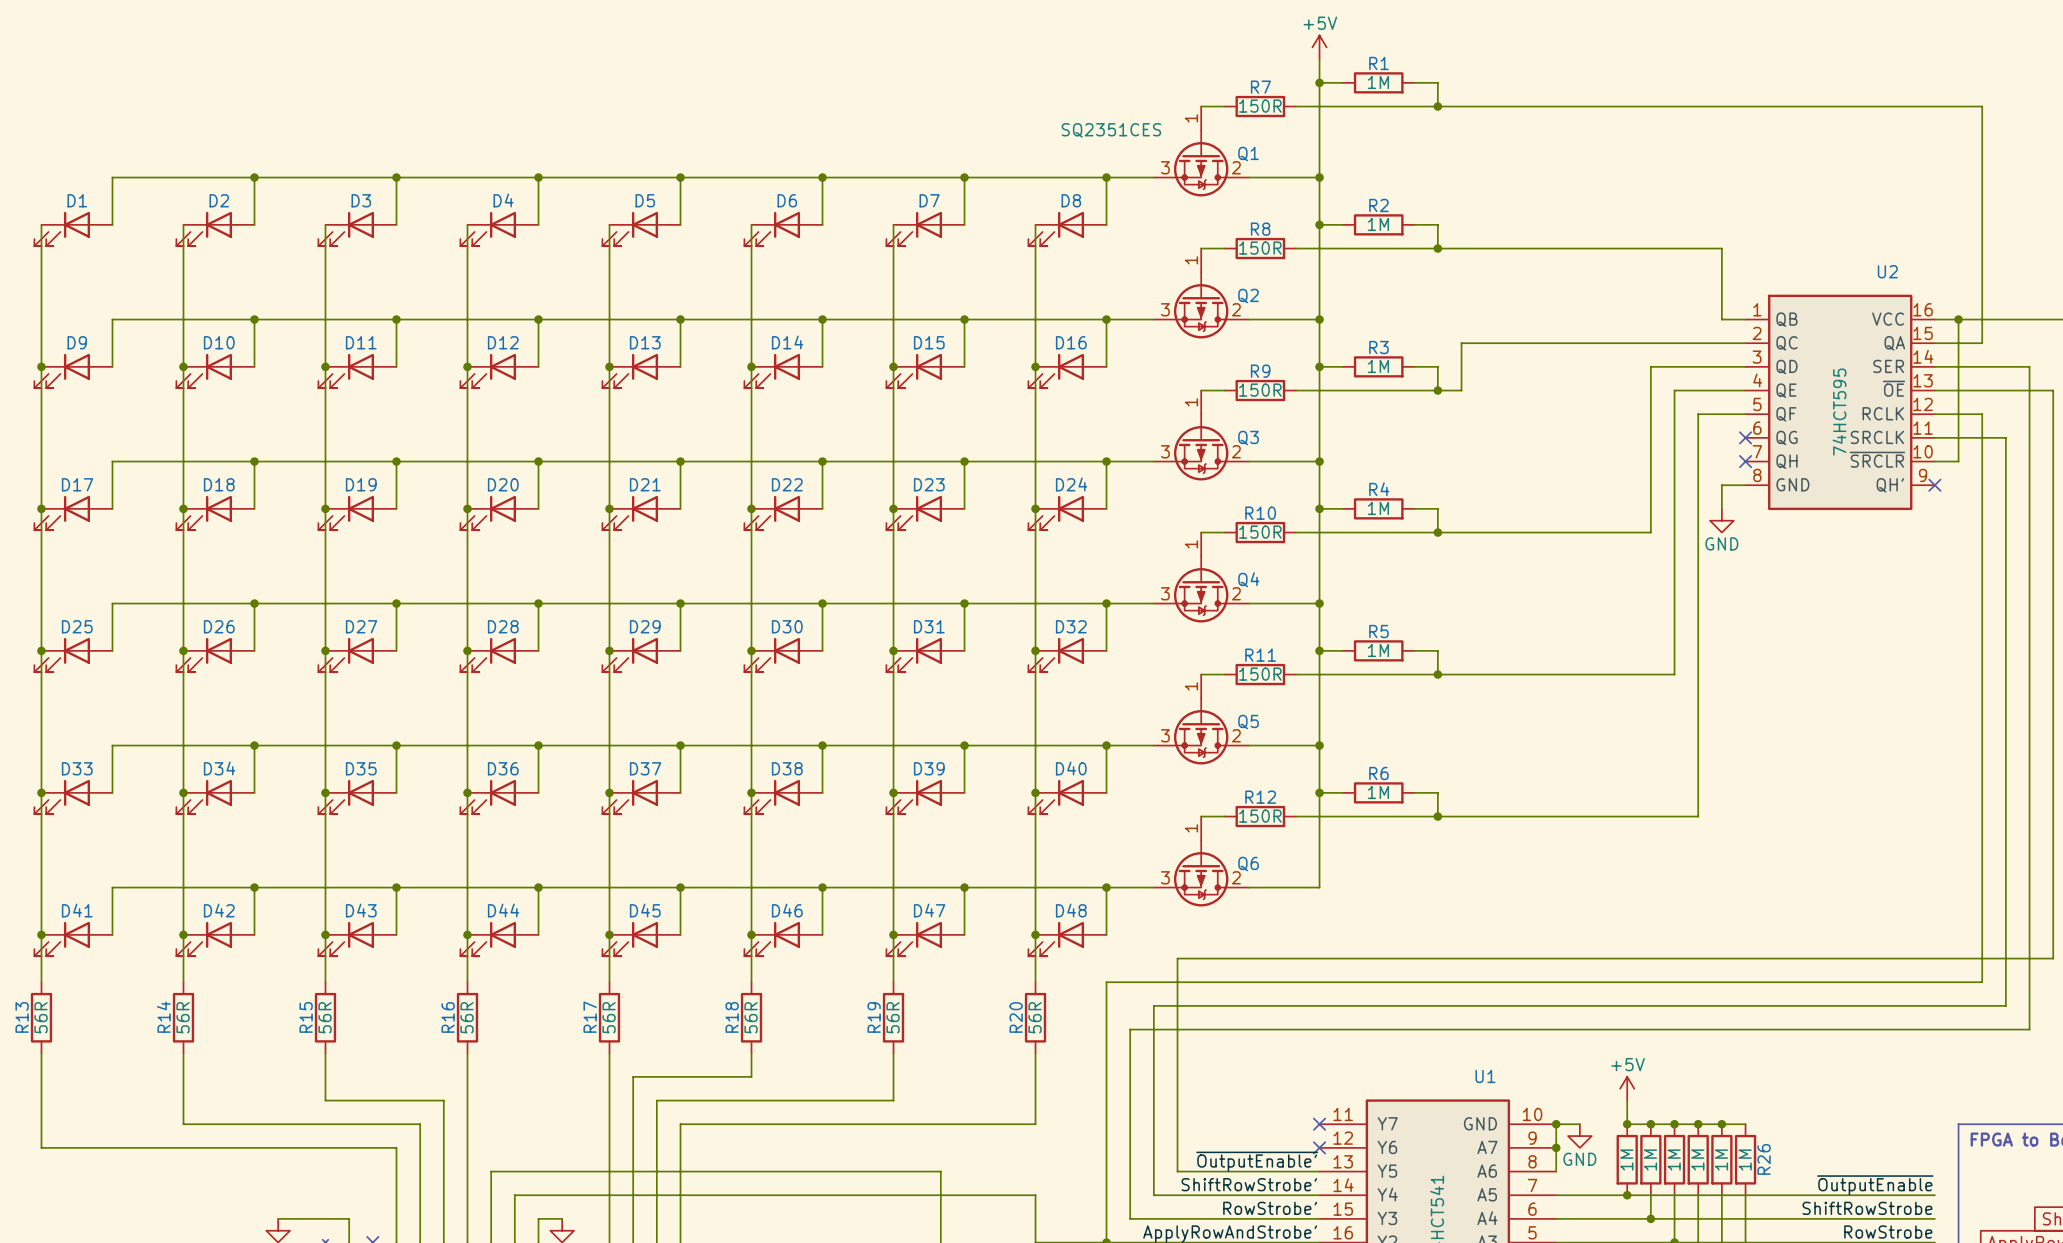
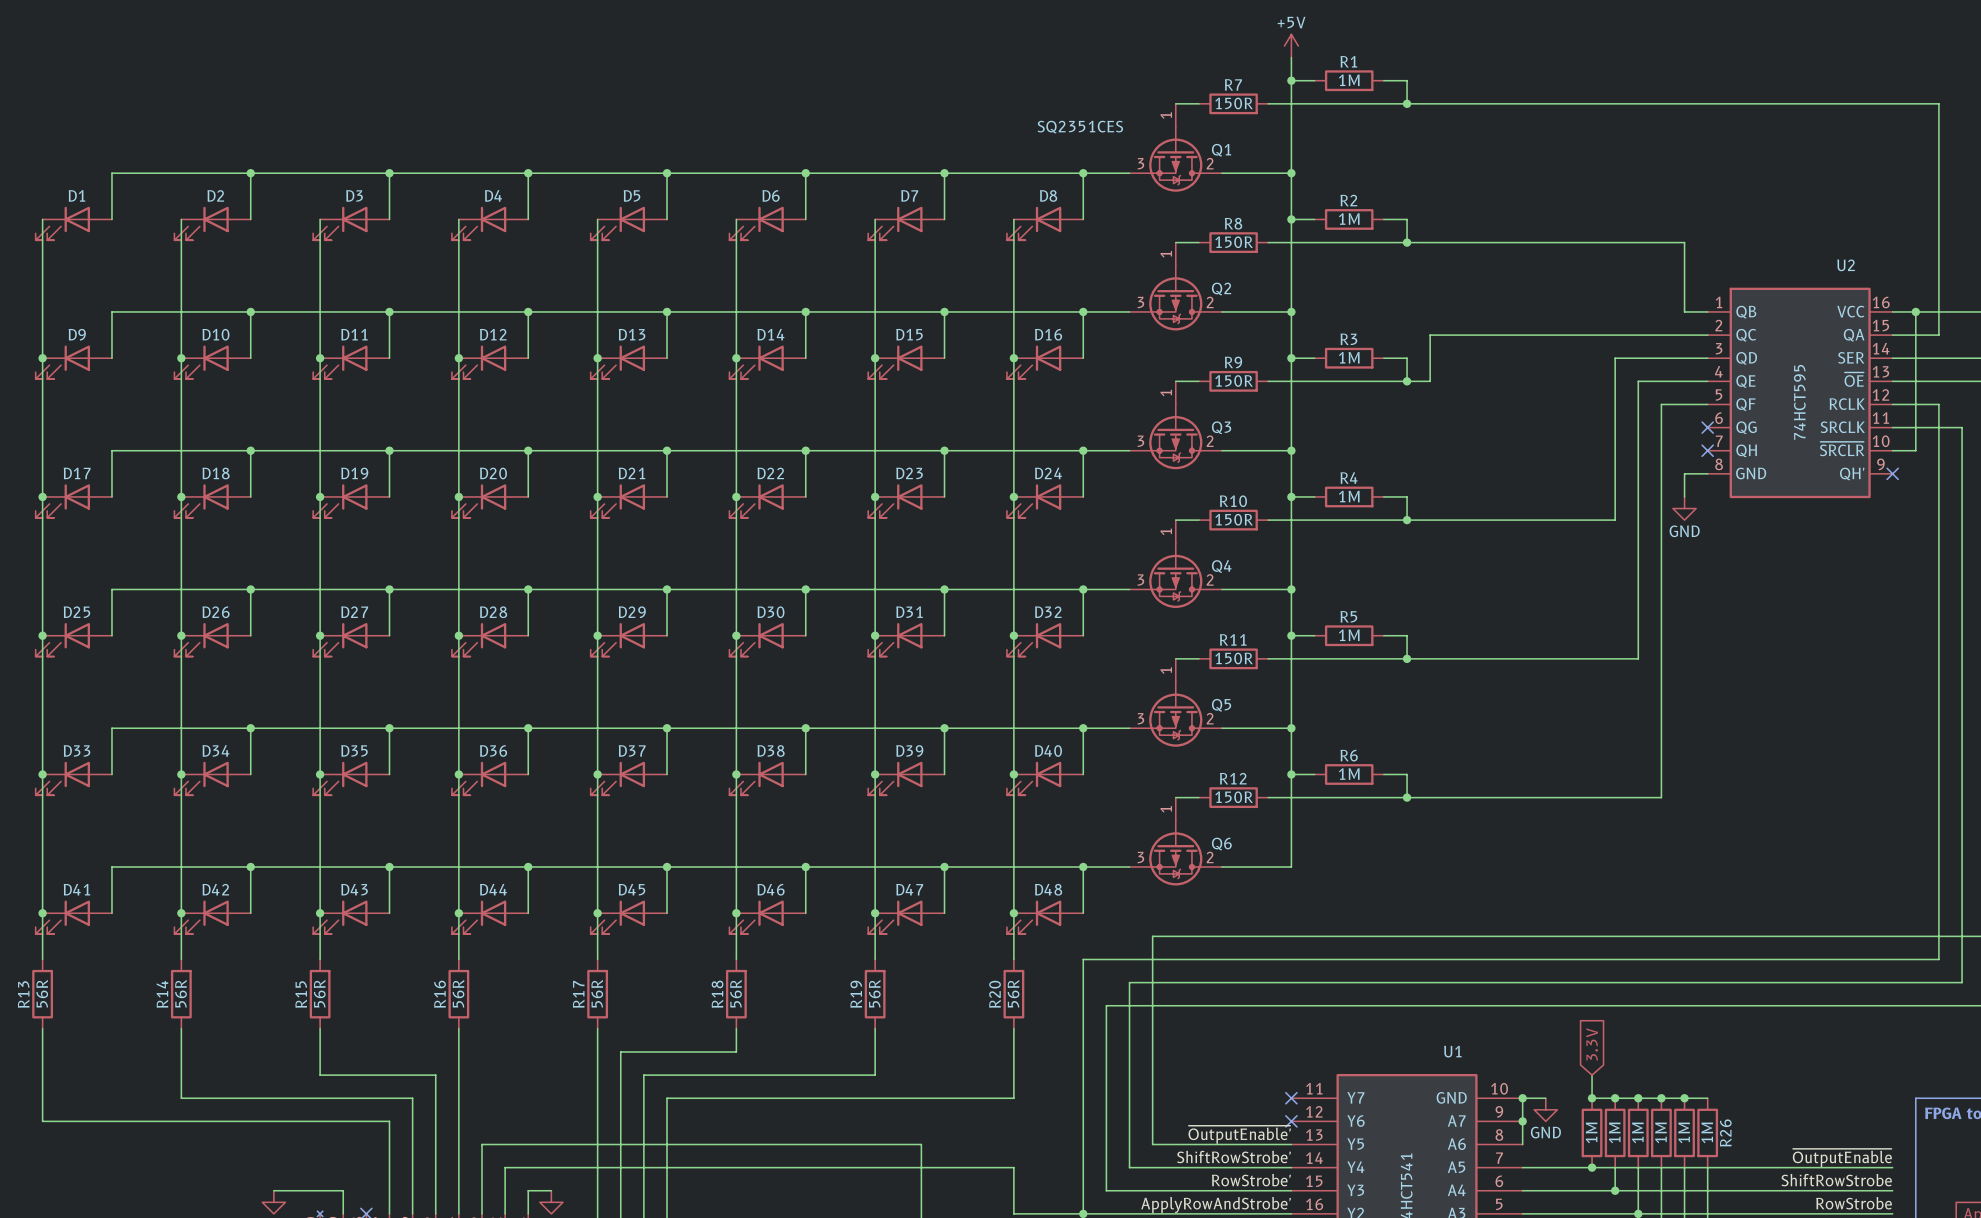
global label: none -> 3.3V (1592, 1044)
power symbol: +5V (1627, 1088) -> none

